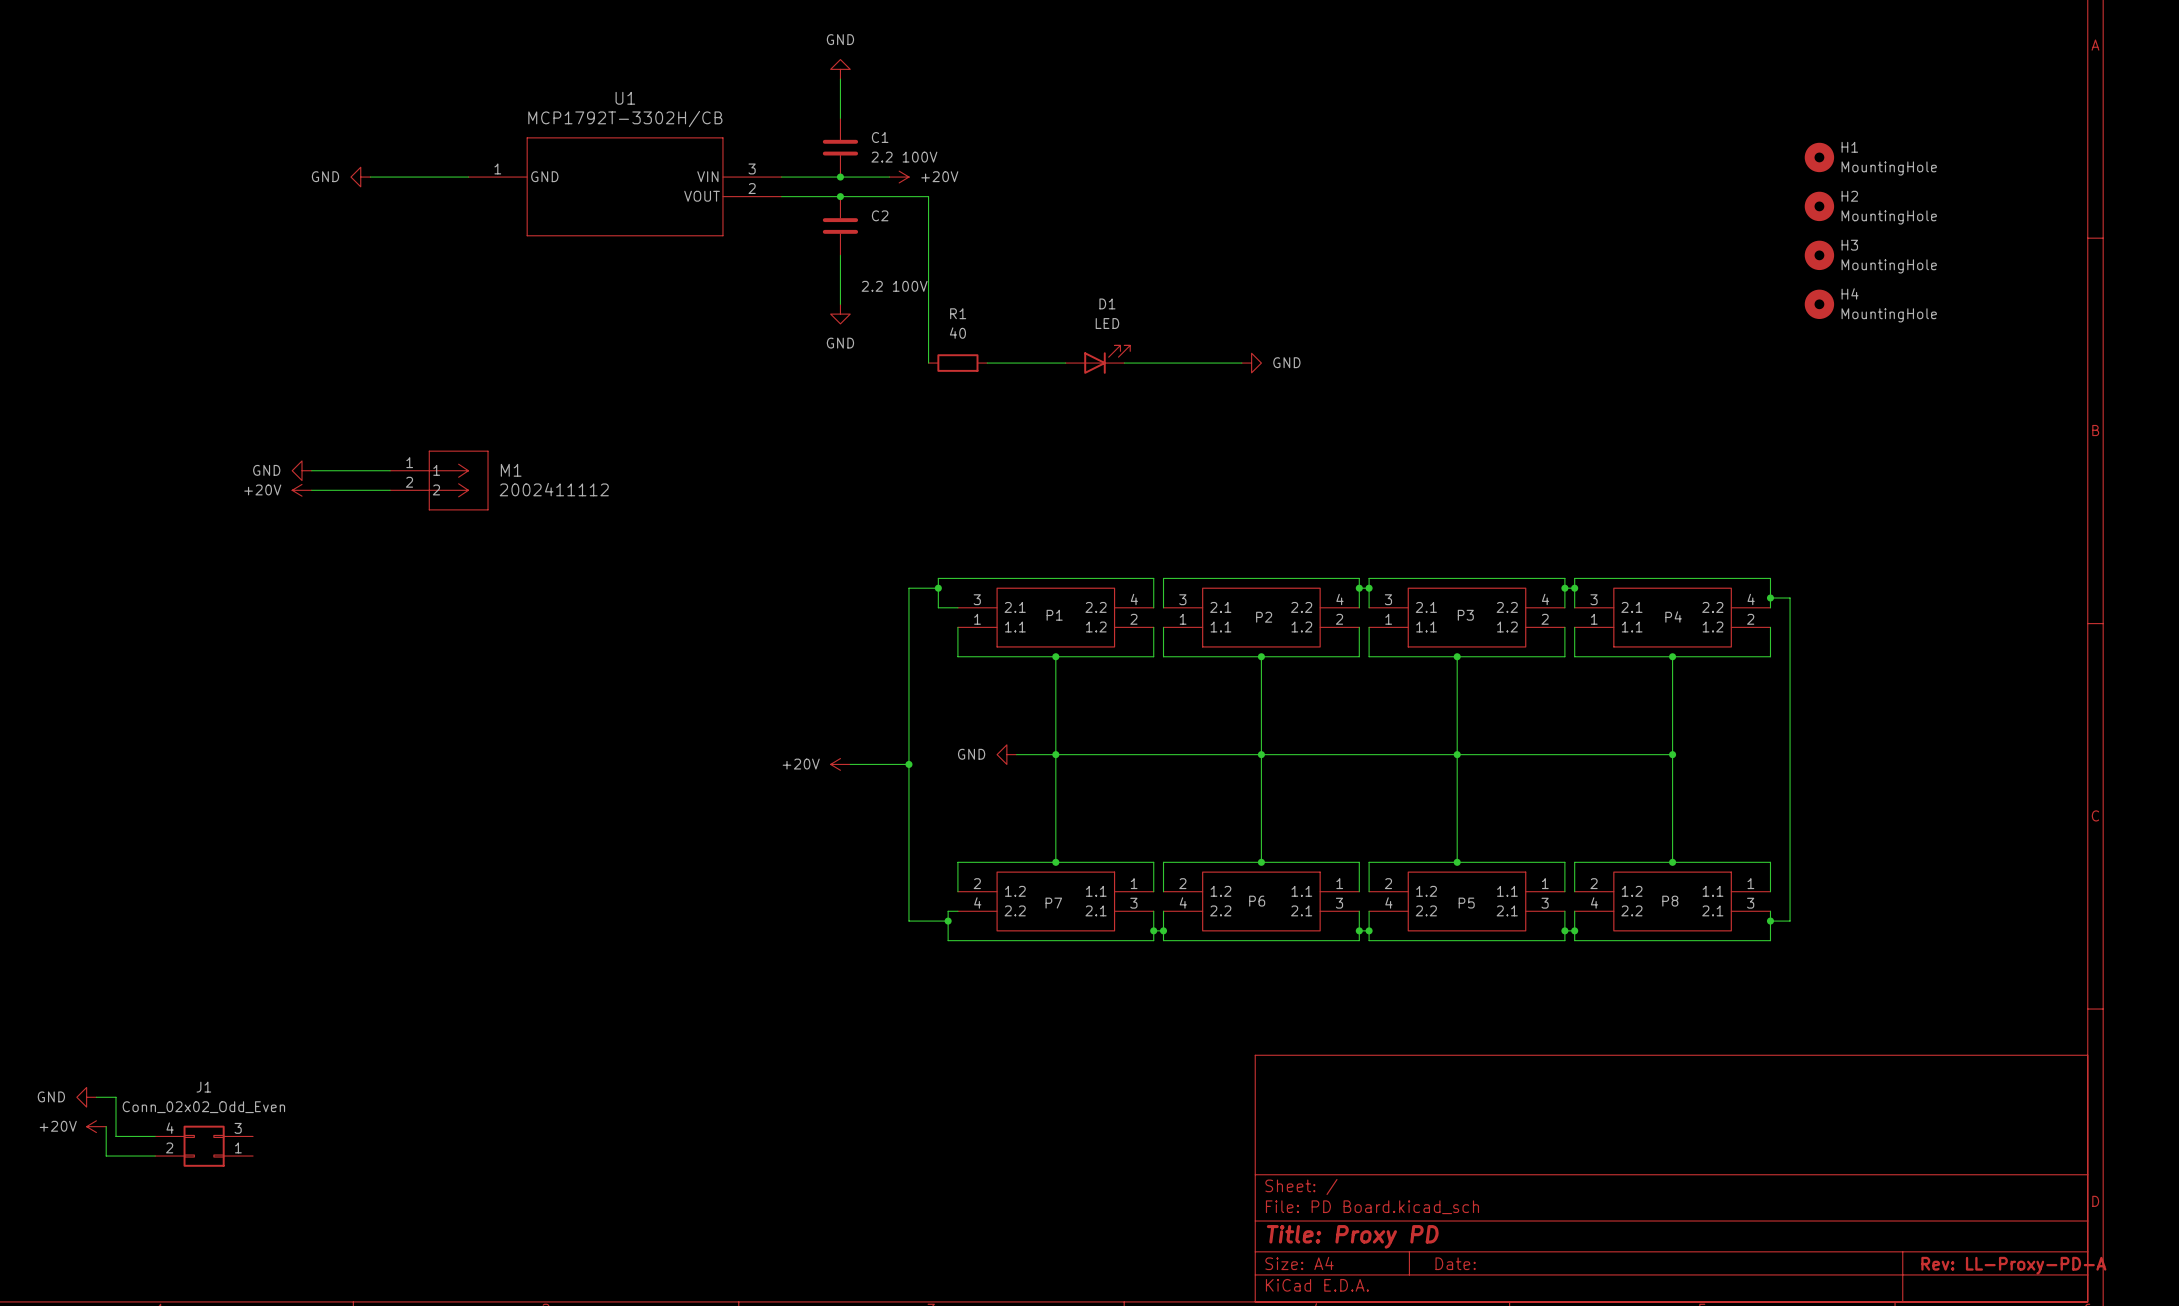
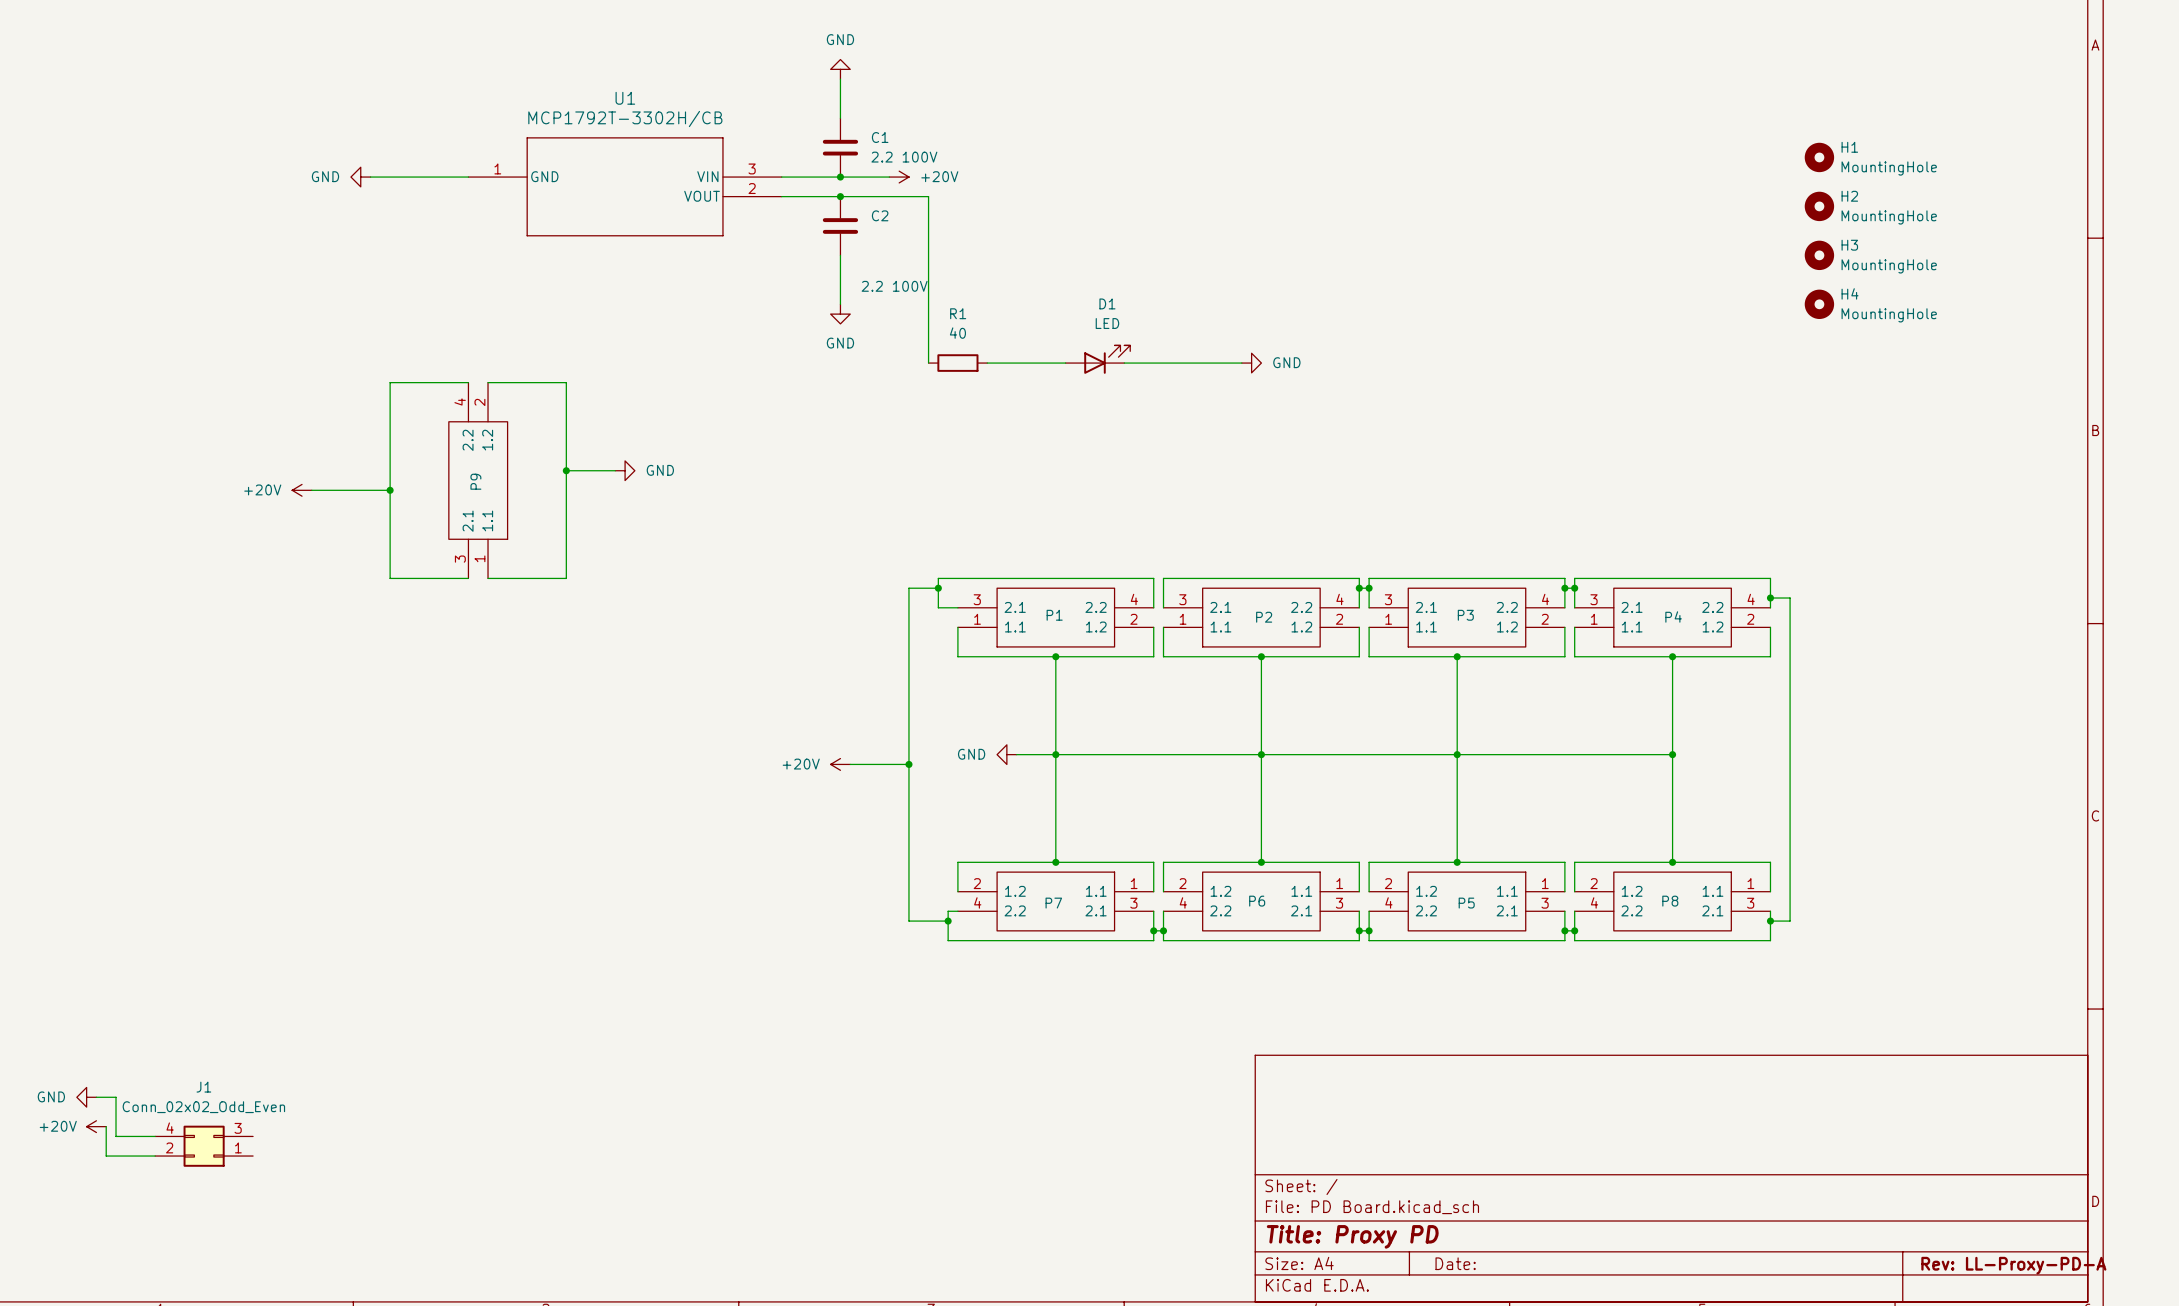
wire: none -> (468, 382) (390, 382) (390, 578) (468, 578)
wire: none -> (488, 382) (566, 382) (566, 578) (488, 578)
power symbol: GND (302, 470) -> none
wire: (311, 470) (390, 470) -> none
wire: none -> (566, 470) (615, 470)
junction: none -> (566, 470)
power symbol: none -> GND (625, 470)
M1: 2002411112 (439, 480) -> none
P9: none -> (478, 480)
junction: none -> (390, 490)

